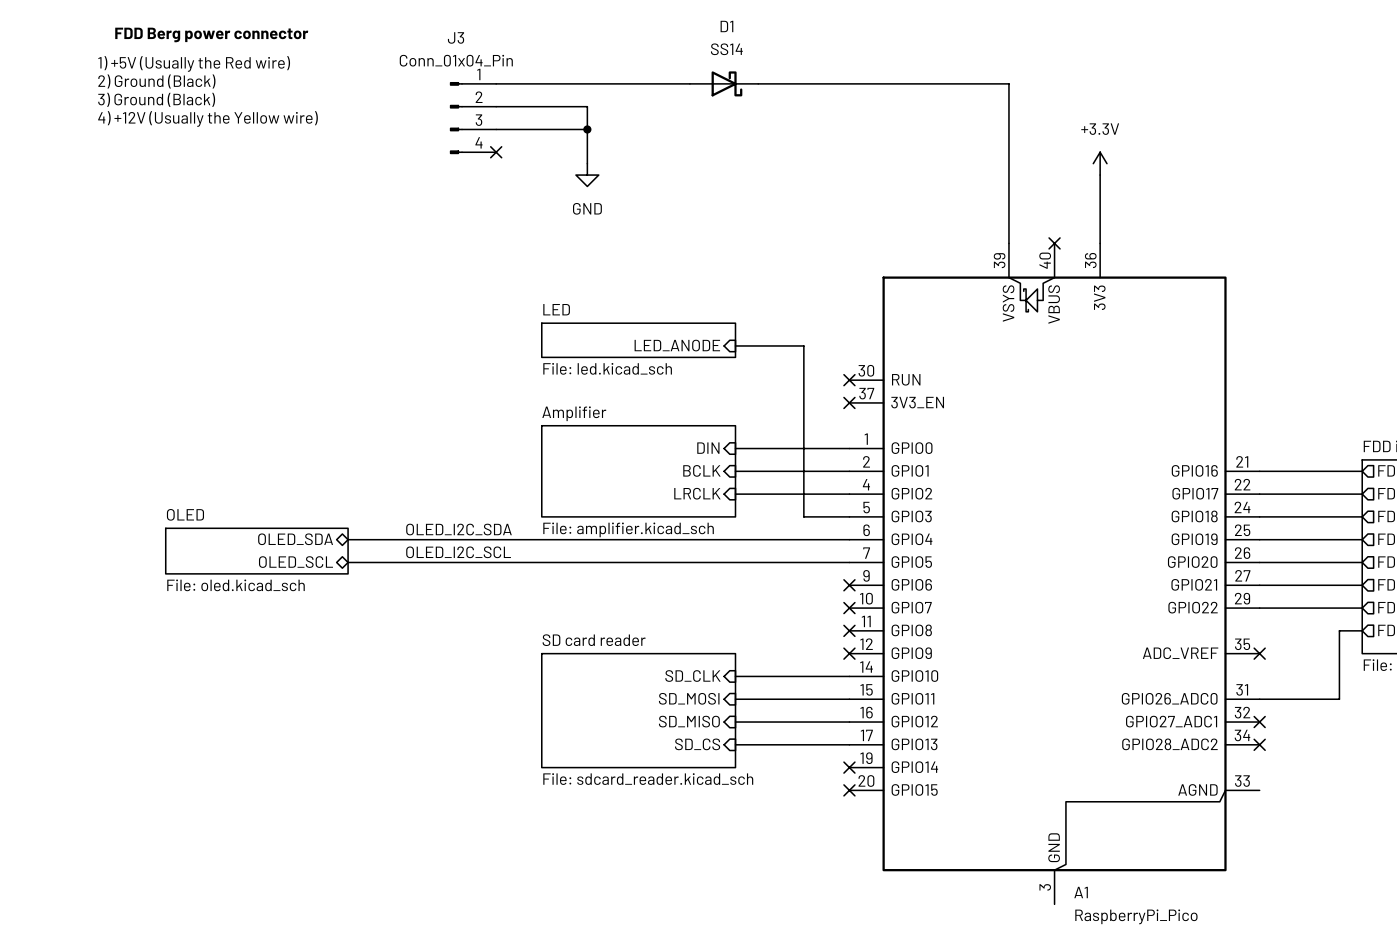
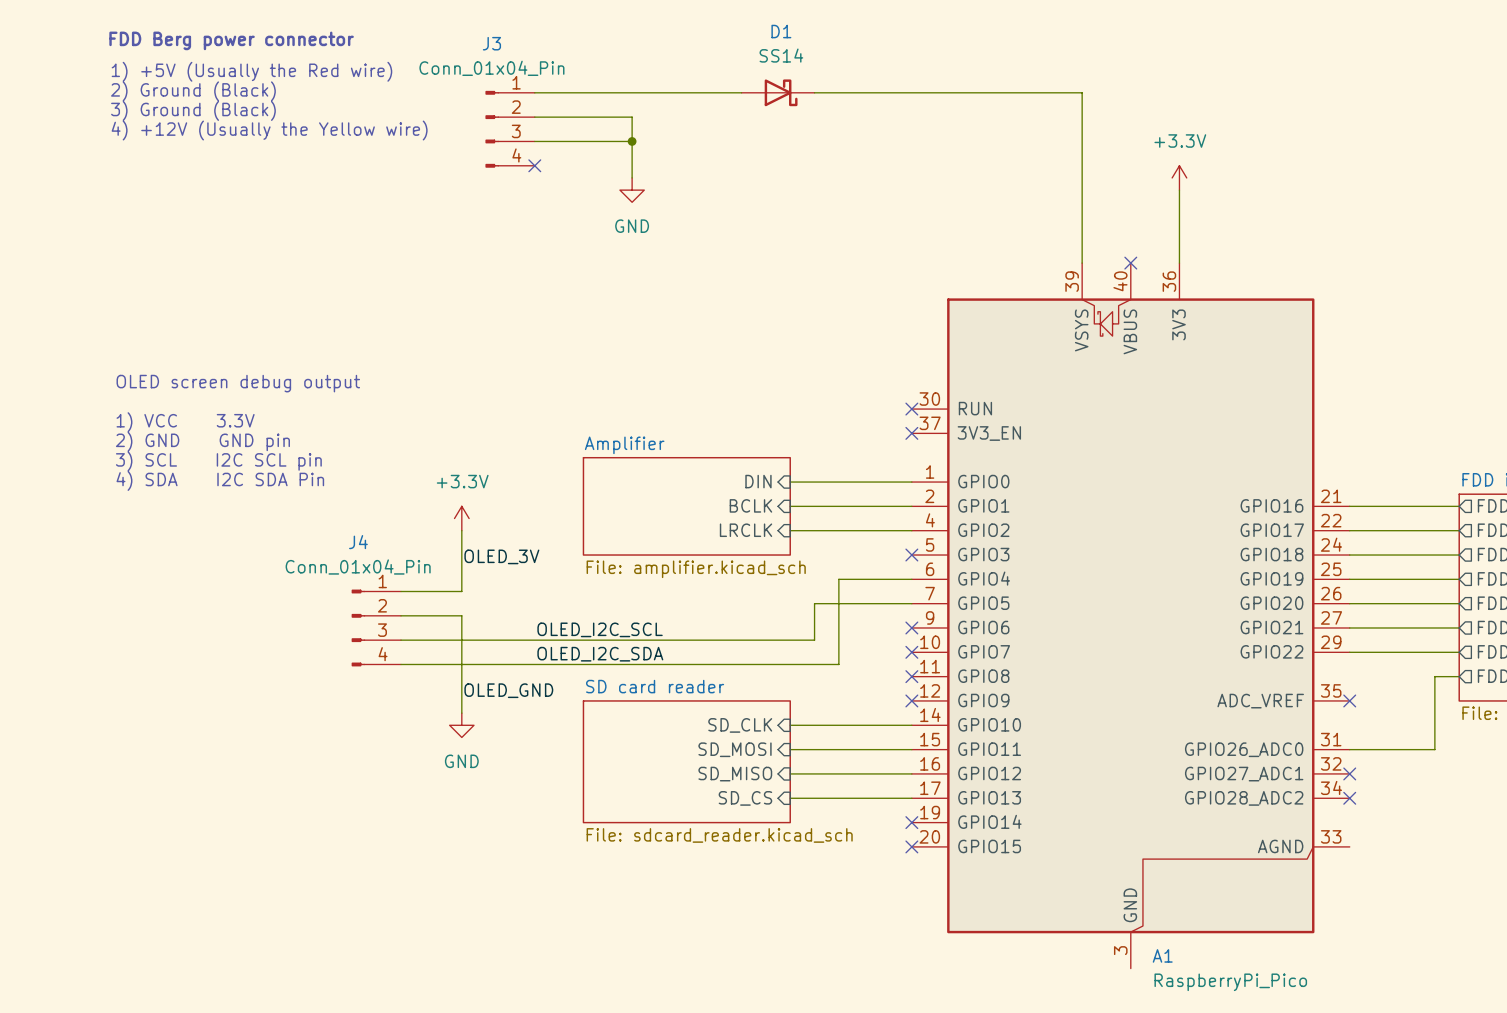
sheet LED: File: led.kicad_sch (638, 340) -> none
sheet pin: LED_ANODE (677, 345) -> none
wire: (735, 345) (803, 345) (803, 516) (849, 516) -> none
text: none -> OLED screen debug output (238, 383)
text: none -> 1) VCC 3.3V (185, 422)
text: none -> 2) GND GND pin (202, 441)
text: none -> 3) SCL I2C SCL pin (218, 461)
text: none -> 4) SDA I2C SDA Pin (220, 480)
power symbol: none -> +3.3V (461, 518)
wire: none -> (461, 530) (461, 591) (401, 591)
no-connect mark: none -> (911, 555)
label: none -> OLED_3V (501, 556)
label position: OLED_I2C_SDA (458, 529) -> OLED_I2C_SDA (600, 654)
sheet pin: OLED_SDA (295, 539) -> none
wire: (348, 539) (781, 539) -> (401, 664) (838, 664) (838, 579)
sheet OLED: File: oled.kicad_sch (256, 551) -> none
label position: OLED_I2C_SCL (458, 552) -> OLED_I2C_SCL (600, 629)
sheet pin: OLED_SCL (295, 562) -> none
wire: (348, 562) (758, 562) -> (401, 640) (814, 640) (814, 603)
wire: none -> (401, 615) (461, 615) (461, 713)
J4: none -> Conn_01x04_Pin (376, 627)
label: none -> OLED_GND (508, 690)
power symbol: none -> GND (461, 725)

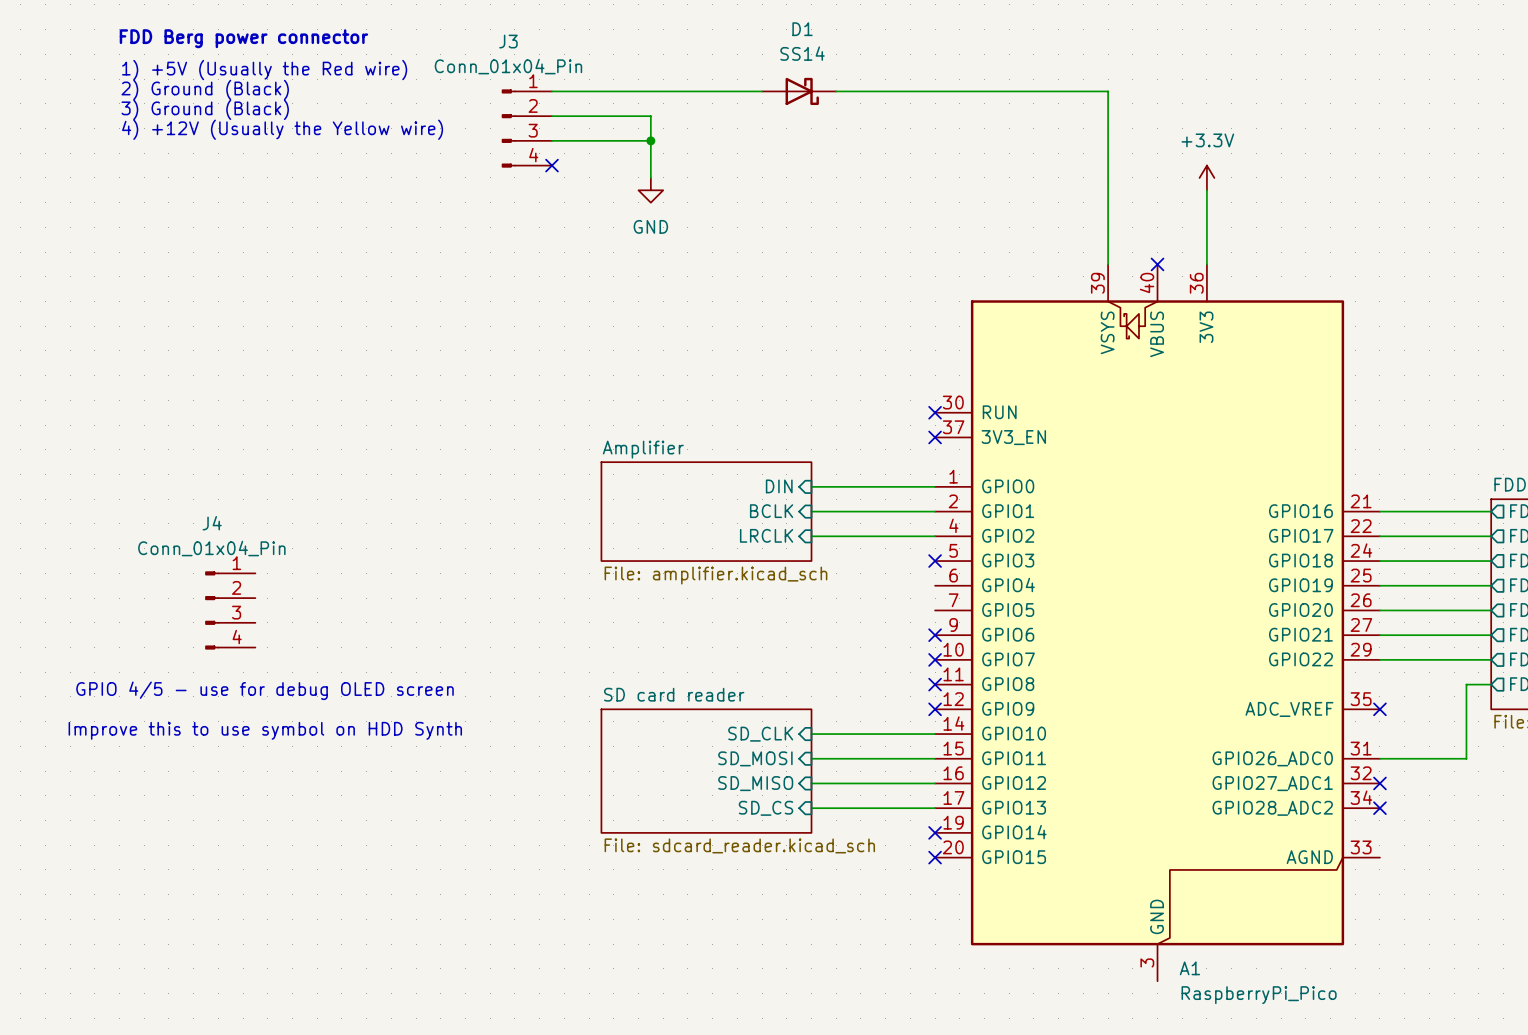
text: OLED screen debug output (238, 383) -> none
text: 1) VCC 3.3V (185, 422) -> none
text: 2) GND GND pin (202, 441) -> none
text: 3) SCL I2C SCL pin (218, 461) -> none
text: 4) SDA I2C SDA Pin (220, 480) -> none
power symbol: +3.3V (461, 518) -> none
wire: (461, 530) (461, 591) (401, 591) -> none
label: OLED_3V (501, 556) -> none
wire: (911, 579) (838, 579) (838, 664) (401, 664) -> none
wire: (911, 603) (814, 603) (814, 640) (401, 640) -> none
wire: (401, 615) (461, 615) (461, 713) -> none
J4 position: (376, 627) -> (230, 610)
label: OLED_I2C_SCL (600, 629) -> none
label: OLED_I2C_SDA (600, 654) -> none
text: none -> GPIO 4/5 - use for debug OLED screen (265, 690)
label: OLED_GND (508, 690) -> none
text: none -> Improve this to use symbol on HDD Synth (265, 730)
power symbol: GND (461, 725) -> none

